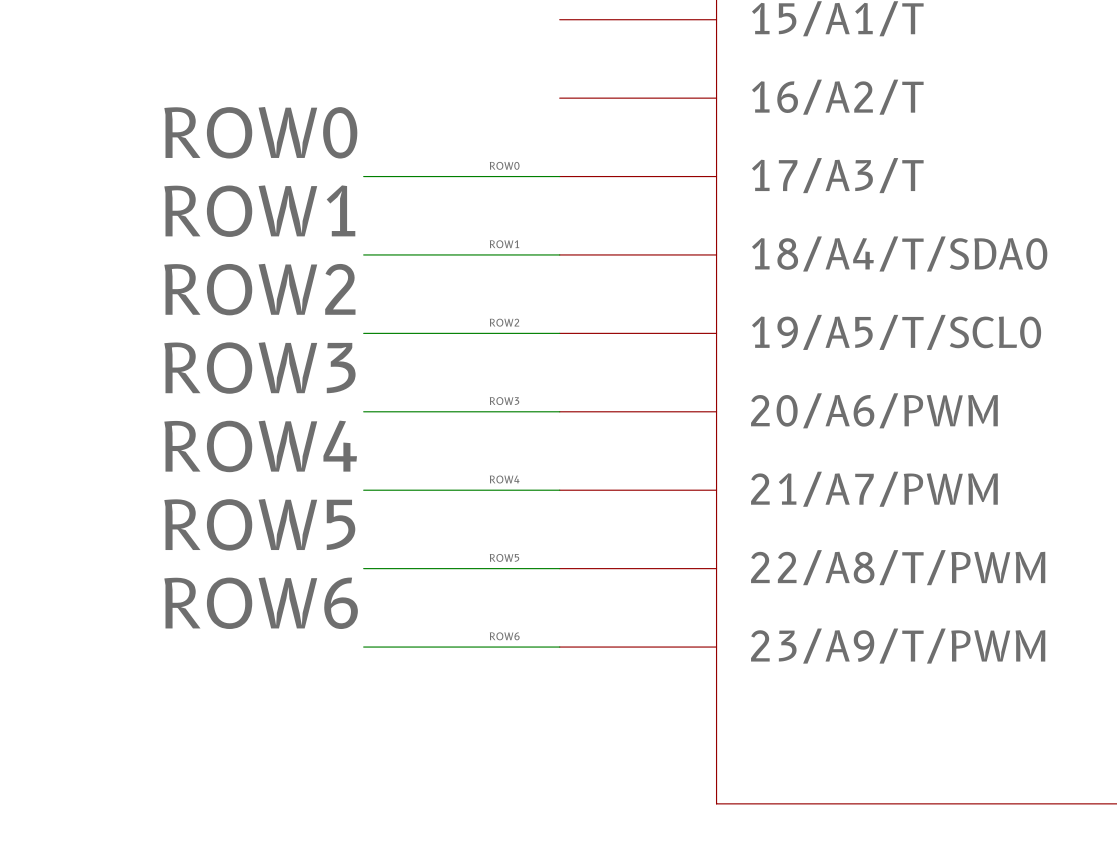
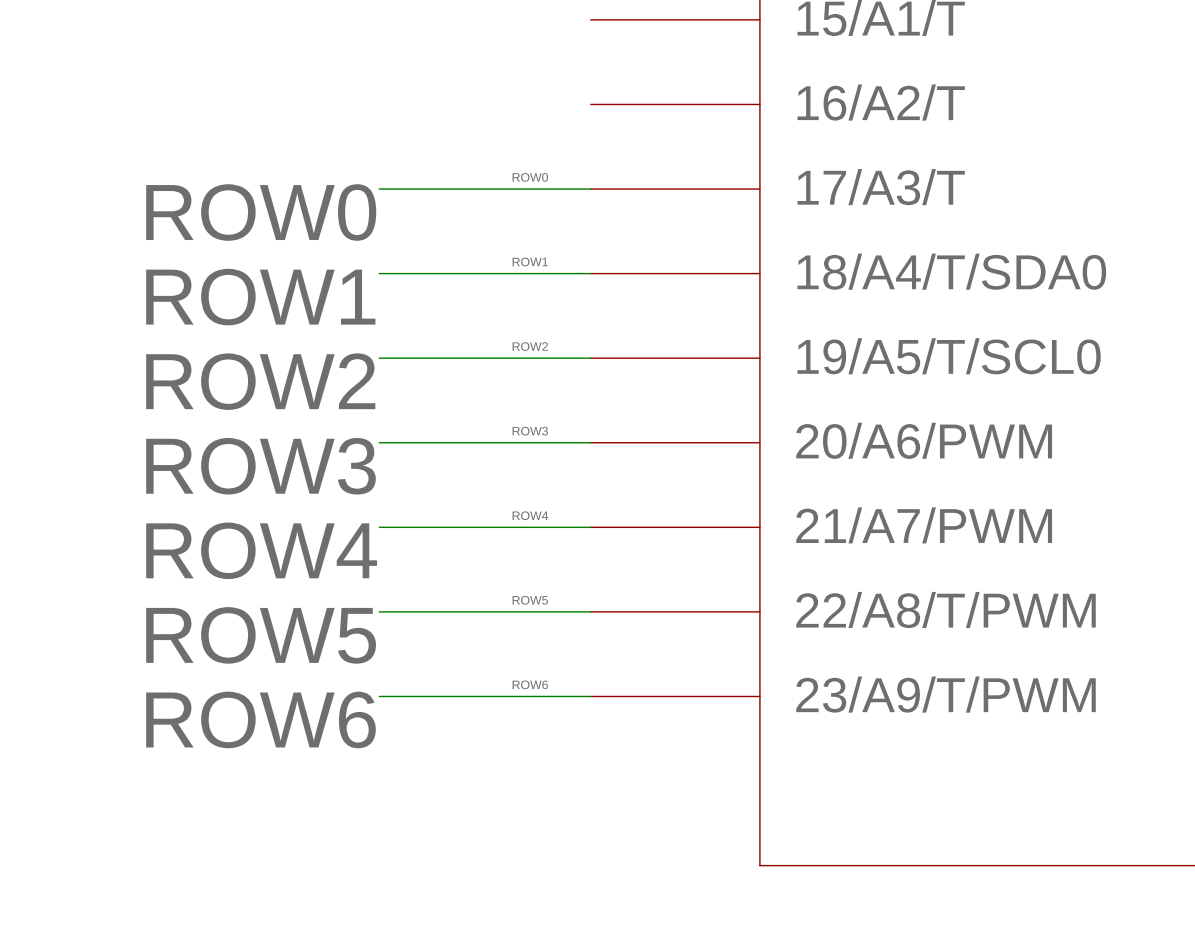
label position: ROW0 (260, 132) -> ROW0 (261, 212)
label position: ROW1 (259, 211) -> ROW1 (260, 297)
label position: ROW2 (259, 289) -> ROW2 (260, 381)
label position: ROW3 (259, 368) -> ROW3 (261, 466)
label position: ROW4 (260, 446) -> ROW4 (261, 550)
label position: ROW5 (259, 524) -> ROW5 (261, 635)
label position: ROW6 (261, 603) -> ROW6 (261, 719)

